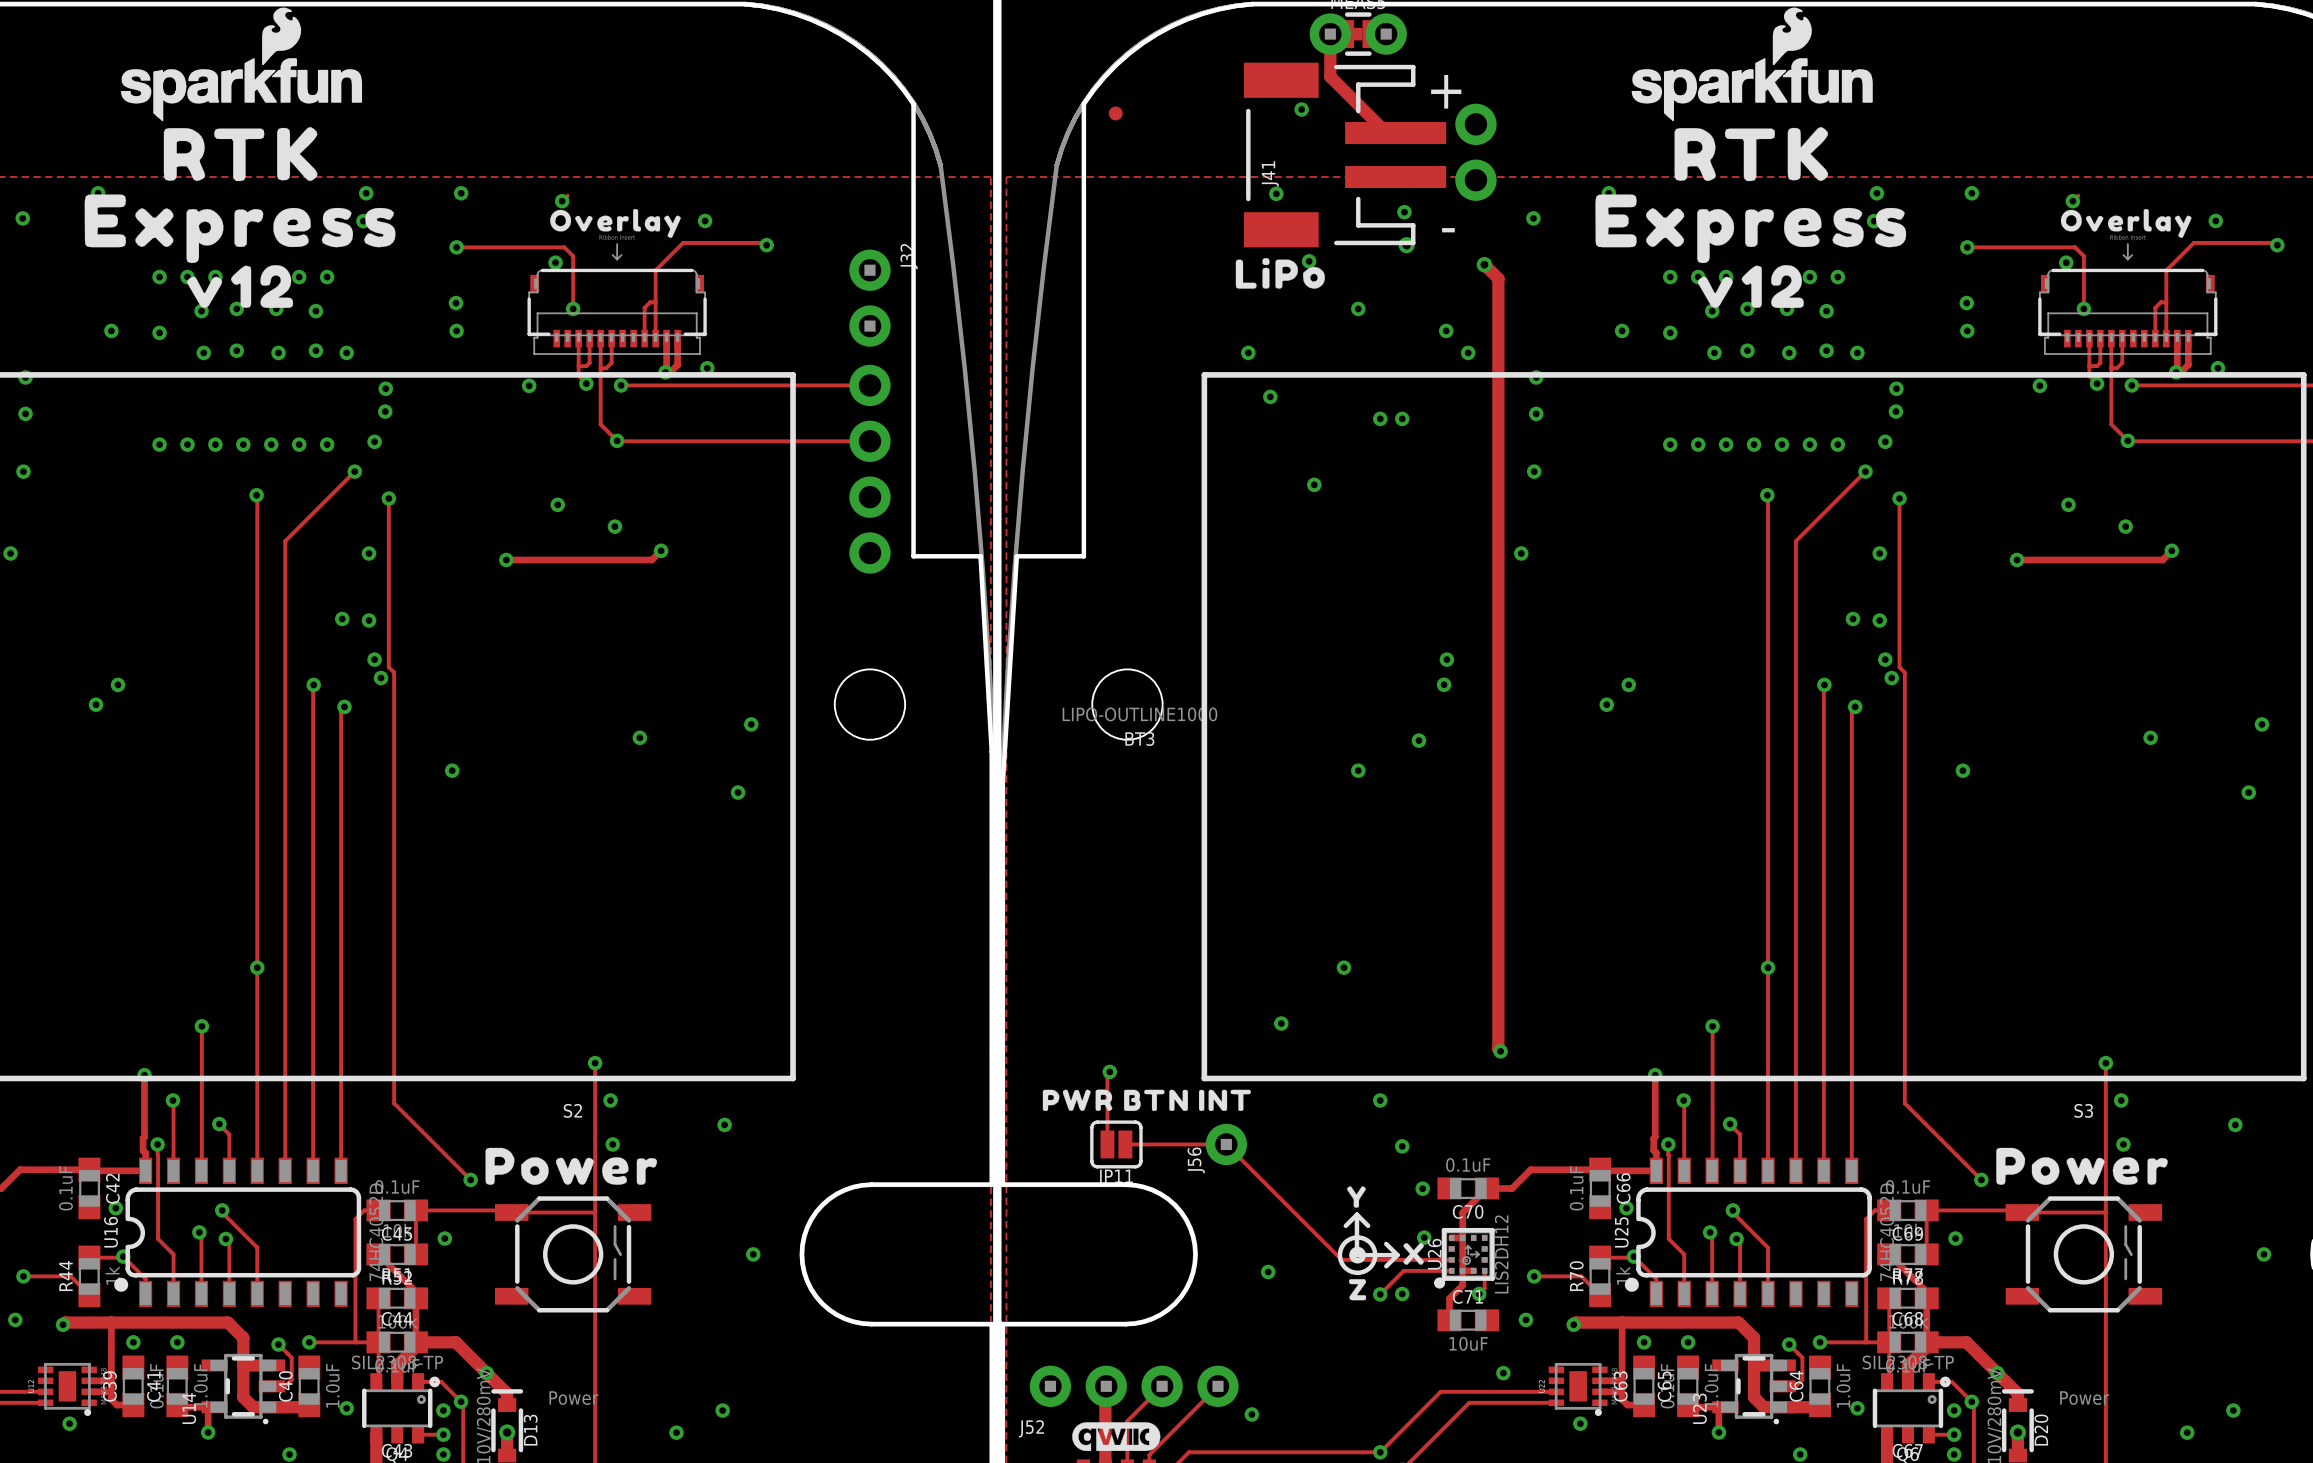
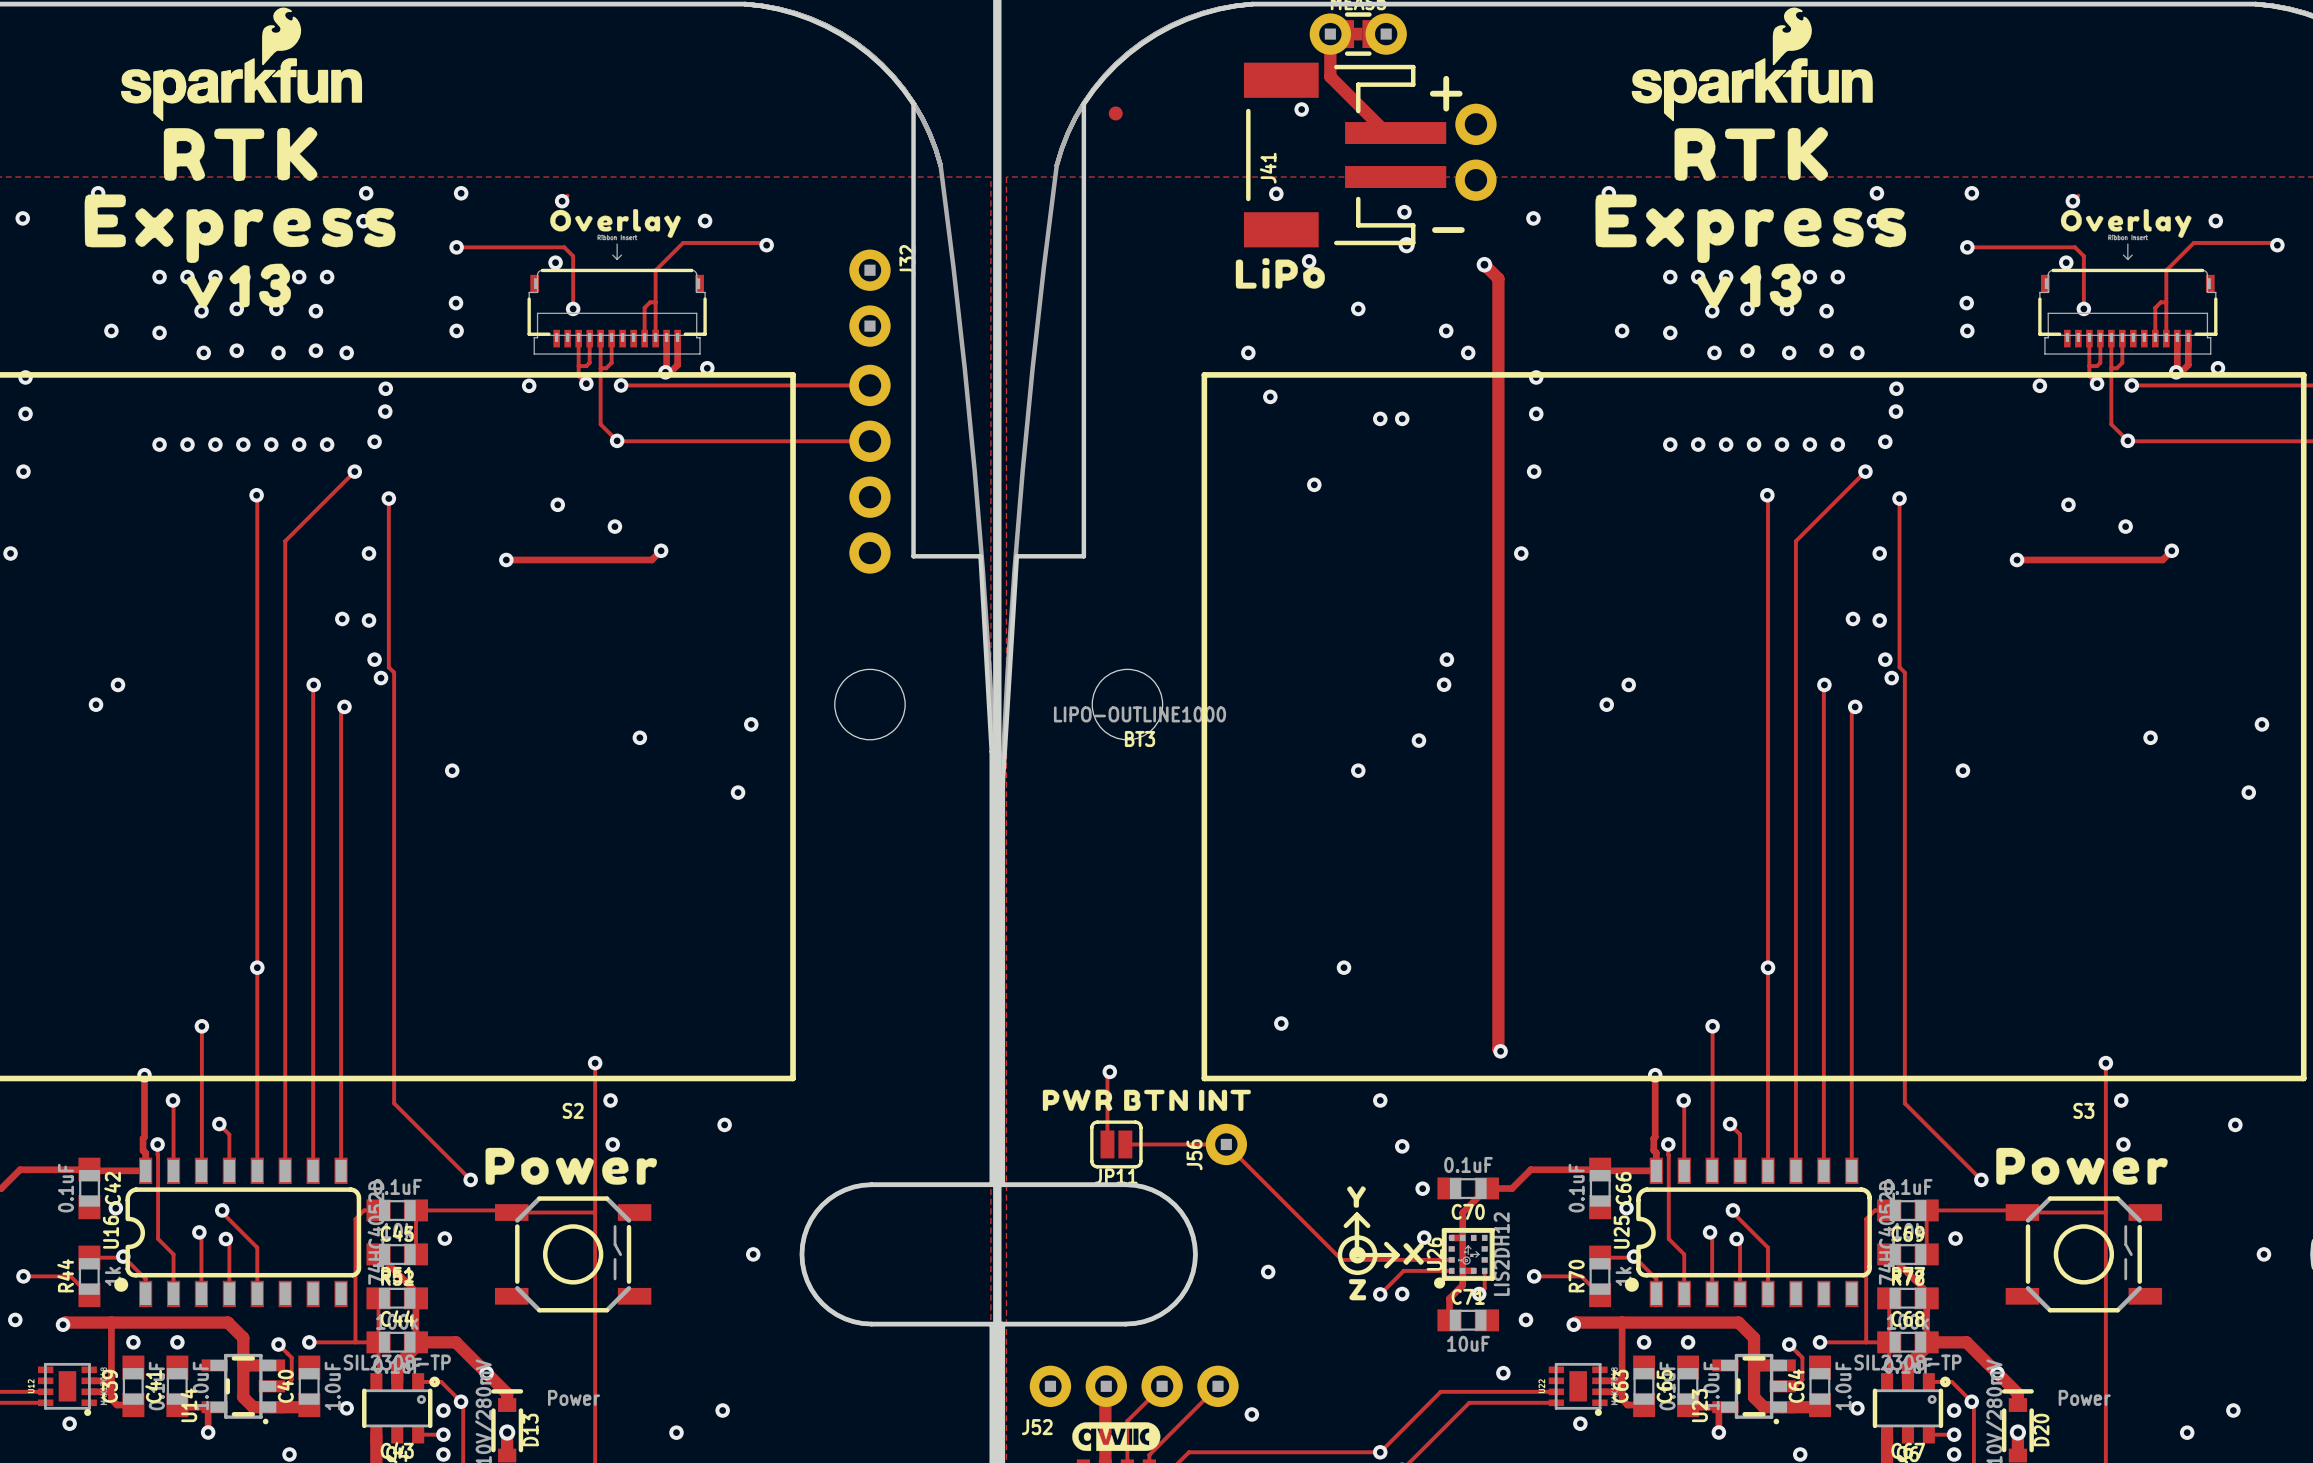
drawing shape: [187, 265, 294, 308] -> [185, 263, 292, 308]
drawing shape: [1697, 265, 1804, 308] -> [1696, 263, 1802, 308]

